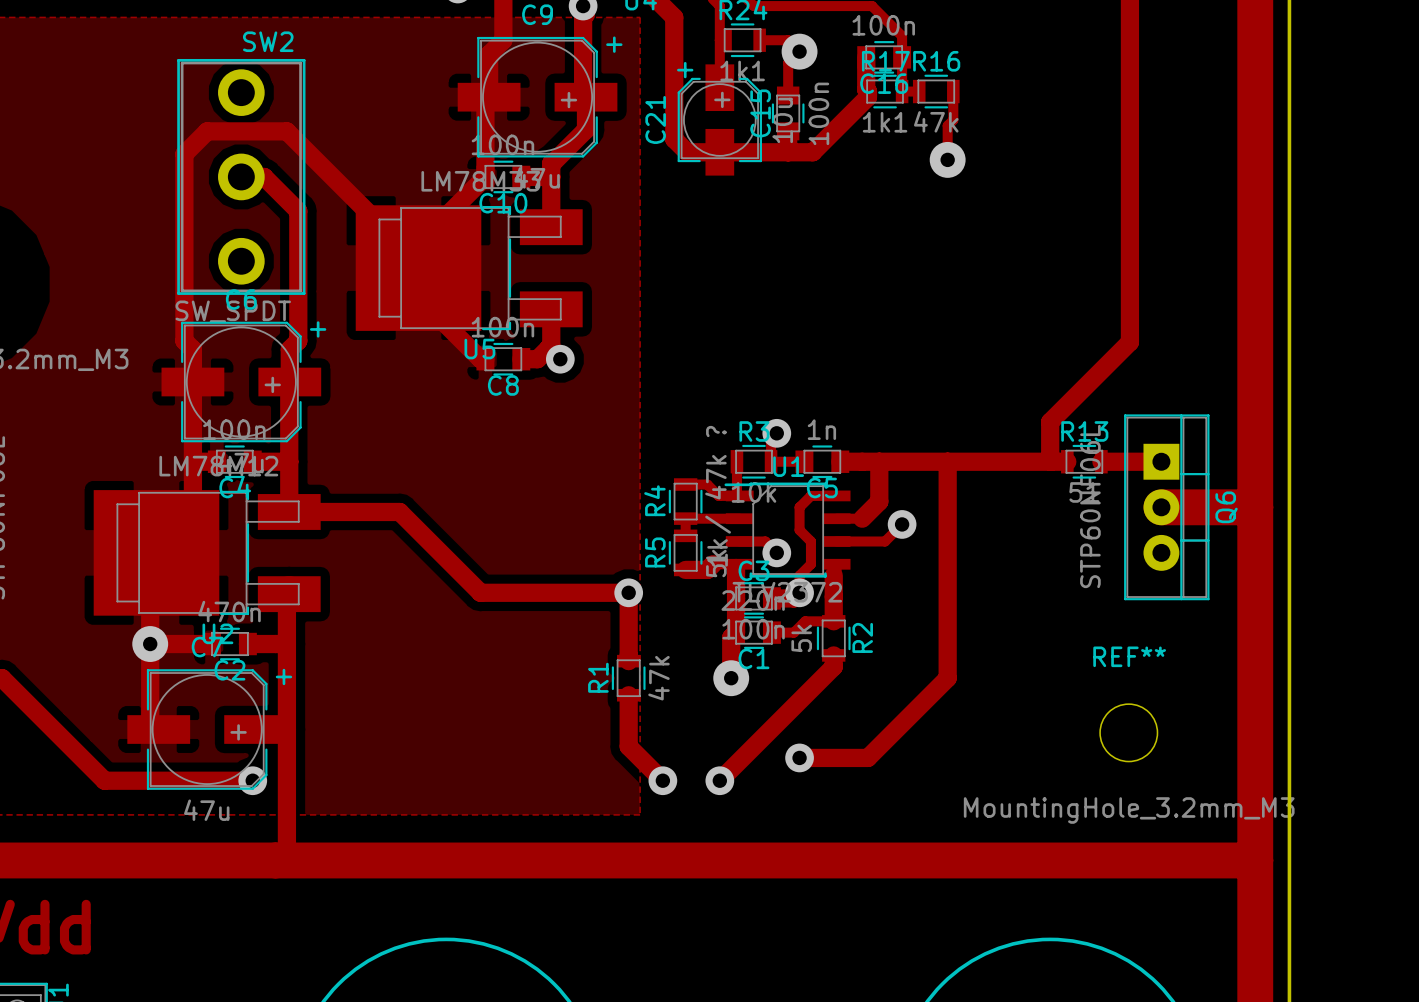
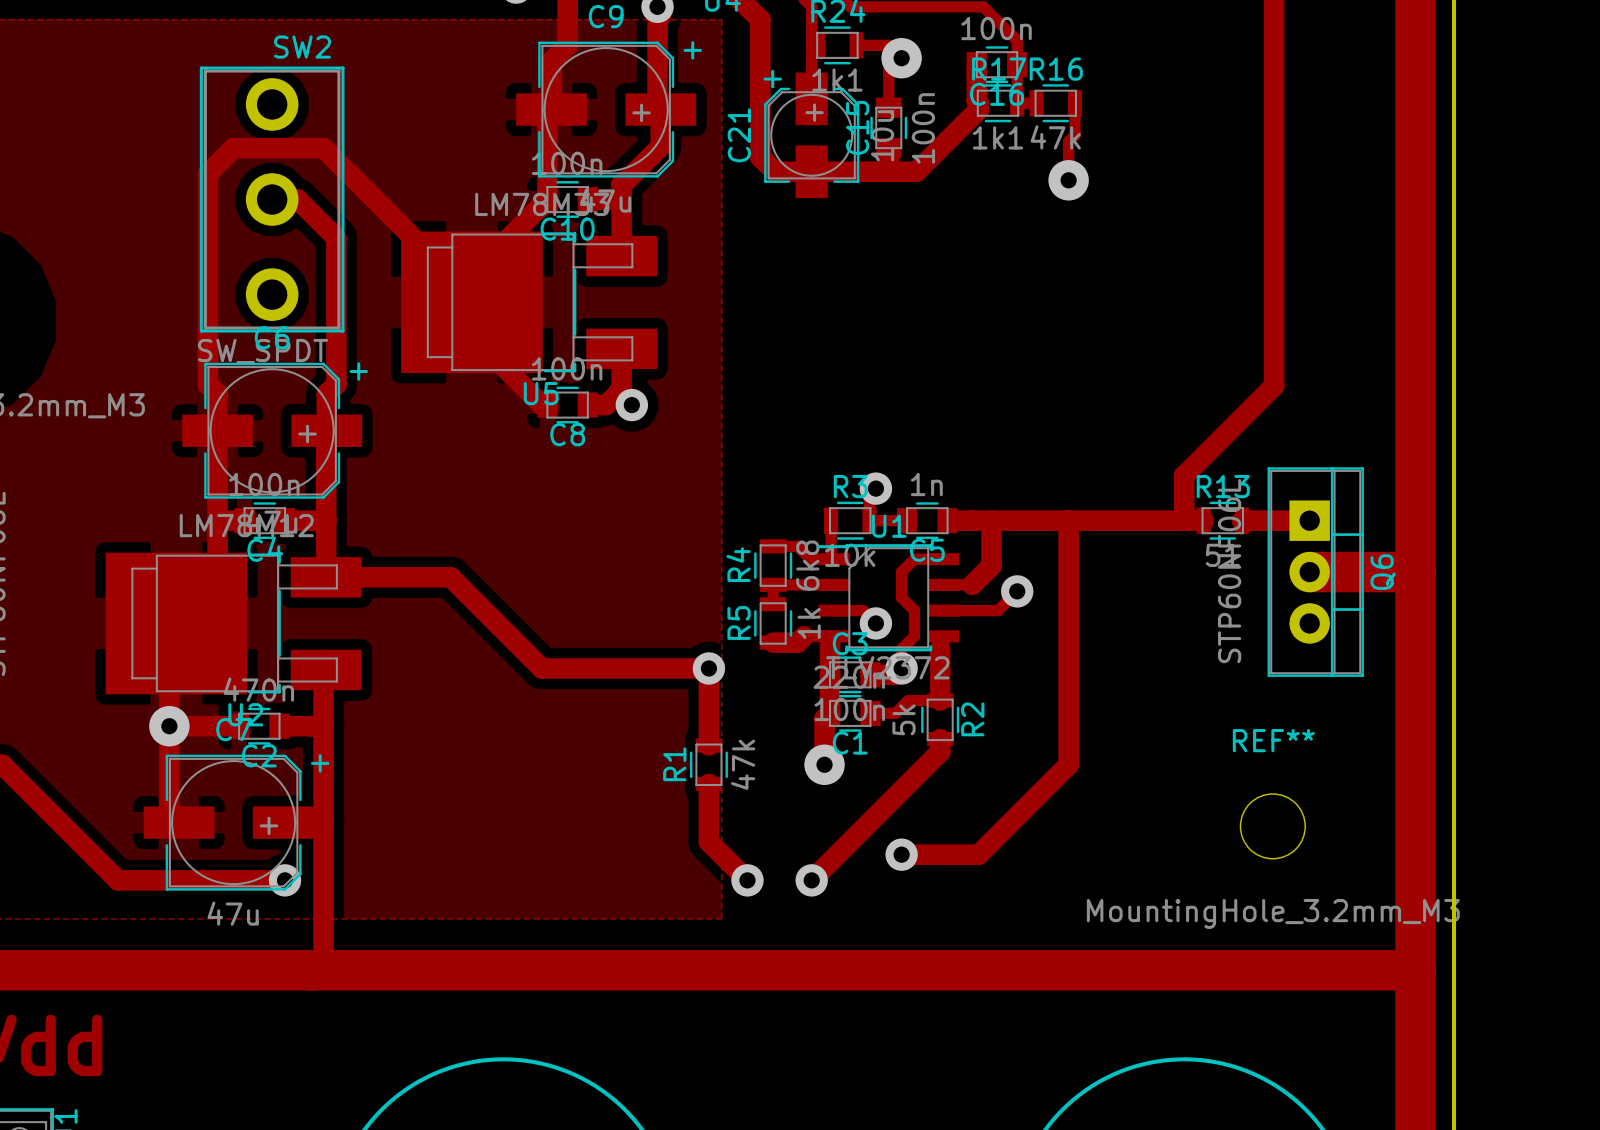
R4 value: 5k / 47k ? (718, 501) -> 6k8 (807, 565)

